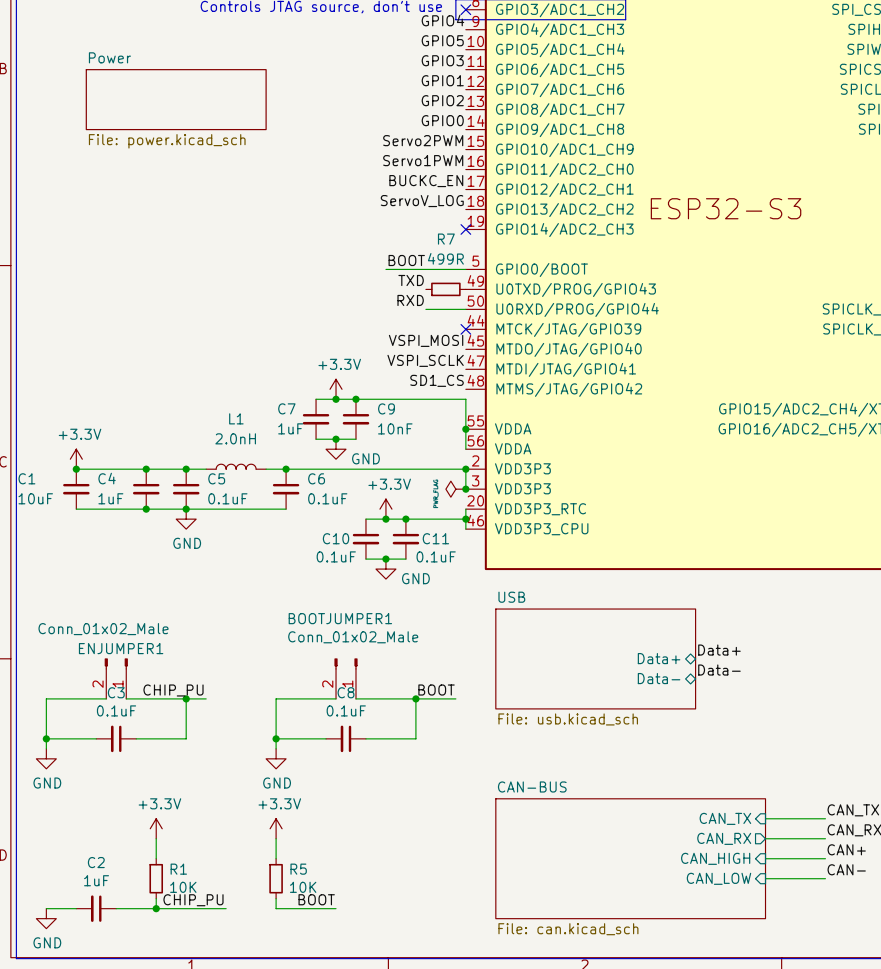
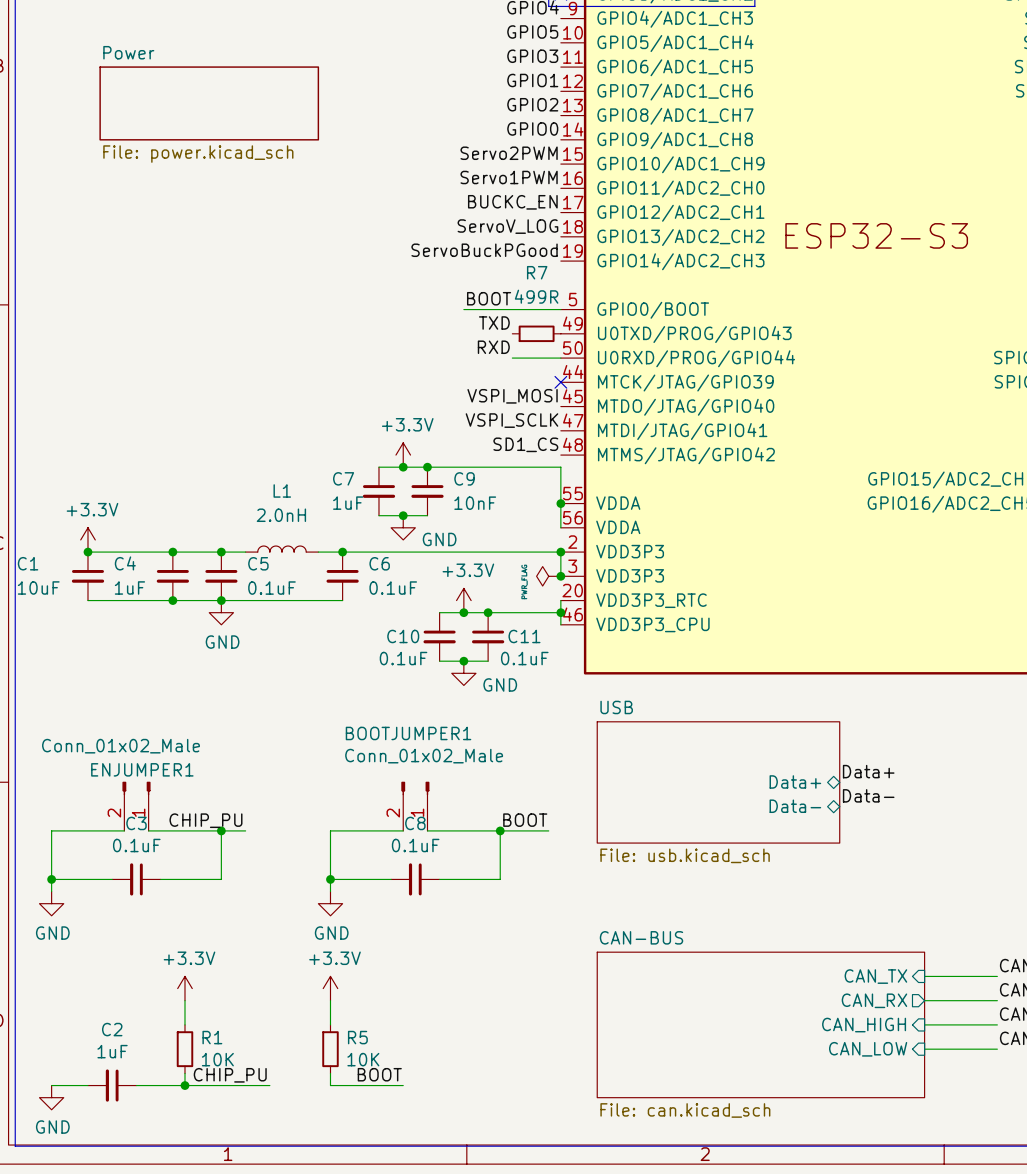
label: none -> ServoBuckPGood (484, 250)
no-connect mark: (465, 229) -> none

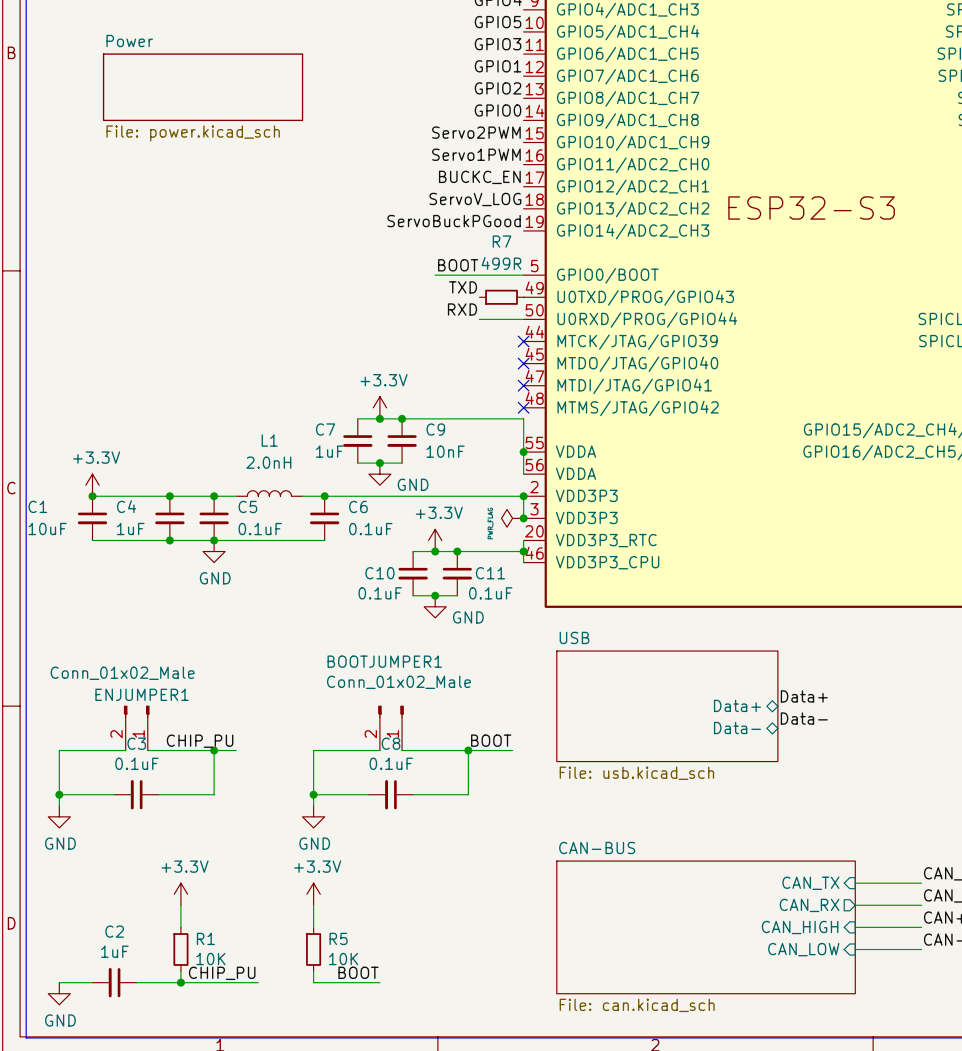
label: VSPI_MOSI (512, 396) -> none
no-connect mark: none -> (523, 363)
label: VSPI_SCLK (511, 420) -> none
no-connect mark: none -> (523, 385)
label: SD1_CS (525, 444) -> none
no-connect mark: none -> (523, 407)

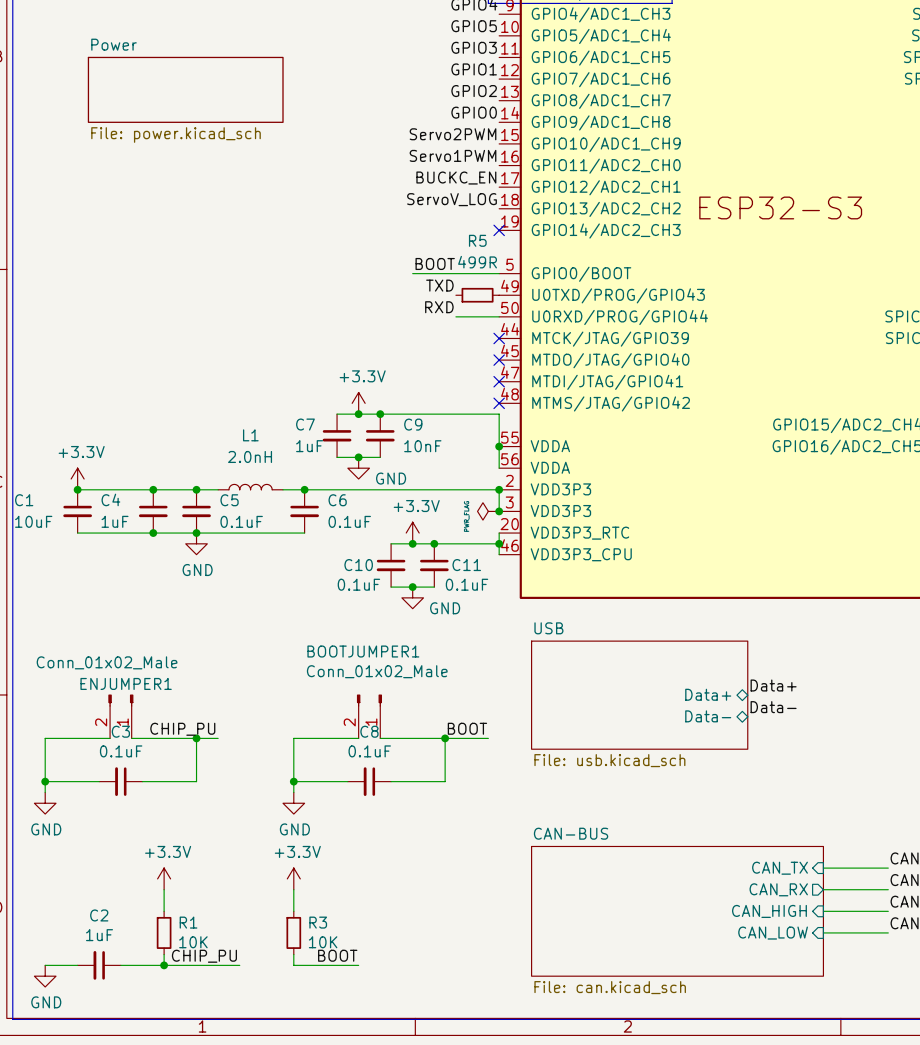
label: ServoBuckPGood (454, 221) -> none
no-connect mark: none -> (499, 230)
R7 name: R7 (502, 241) -> R5 (477, 240)
R5 name: R5 (338, 938) -> R3 (318, 922)

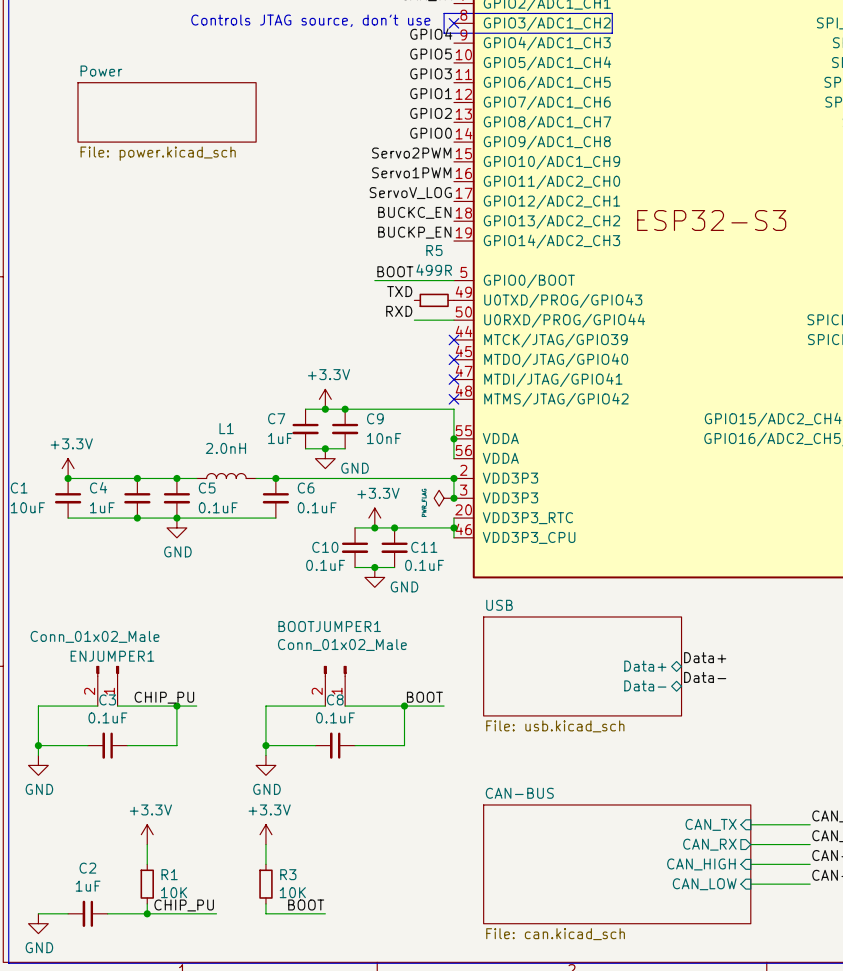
label: BUCKC_EN (456, 178) -> ServoV_LOG (410, 193)
label: ServoV_LOG (451, 199) -> BUCKC_EN (414, 212)
label: none -> BUCKP_EN (414, 232)
no-connect mark: (499, 230) -> none

